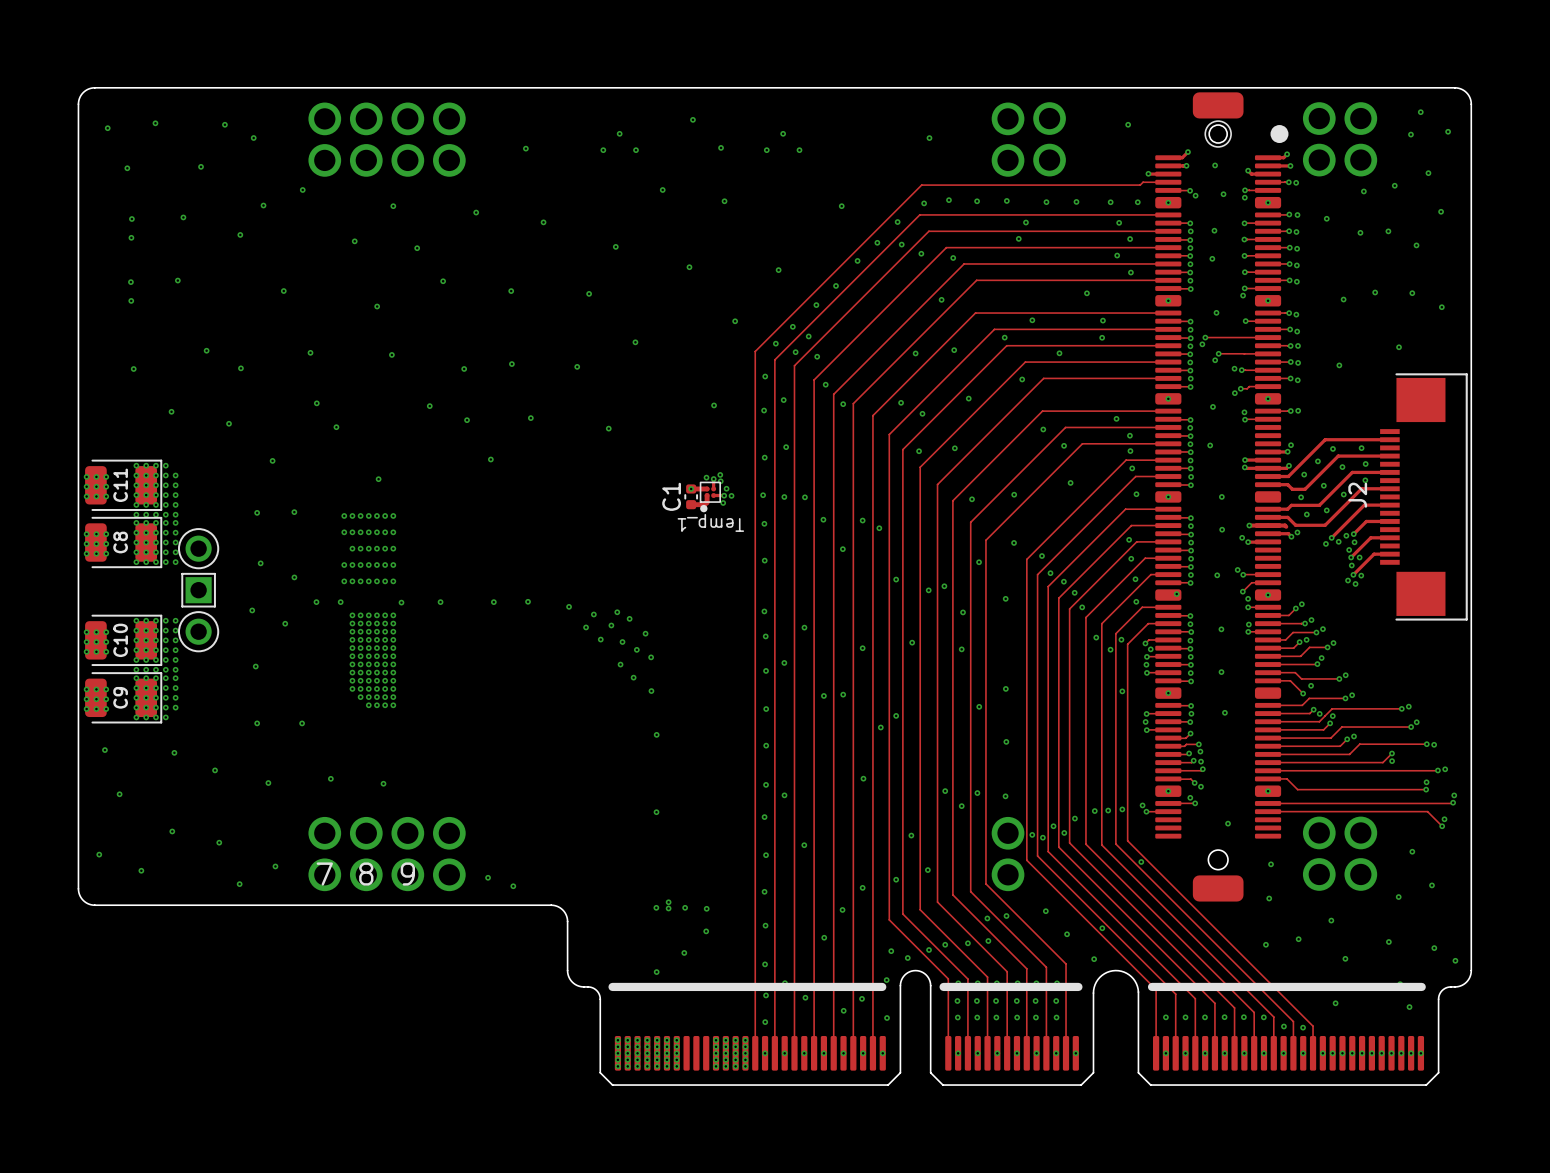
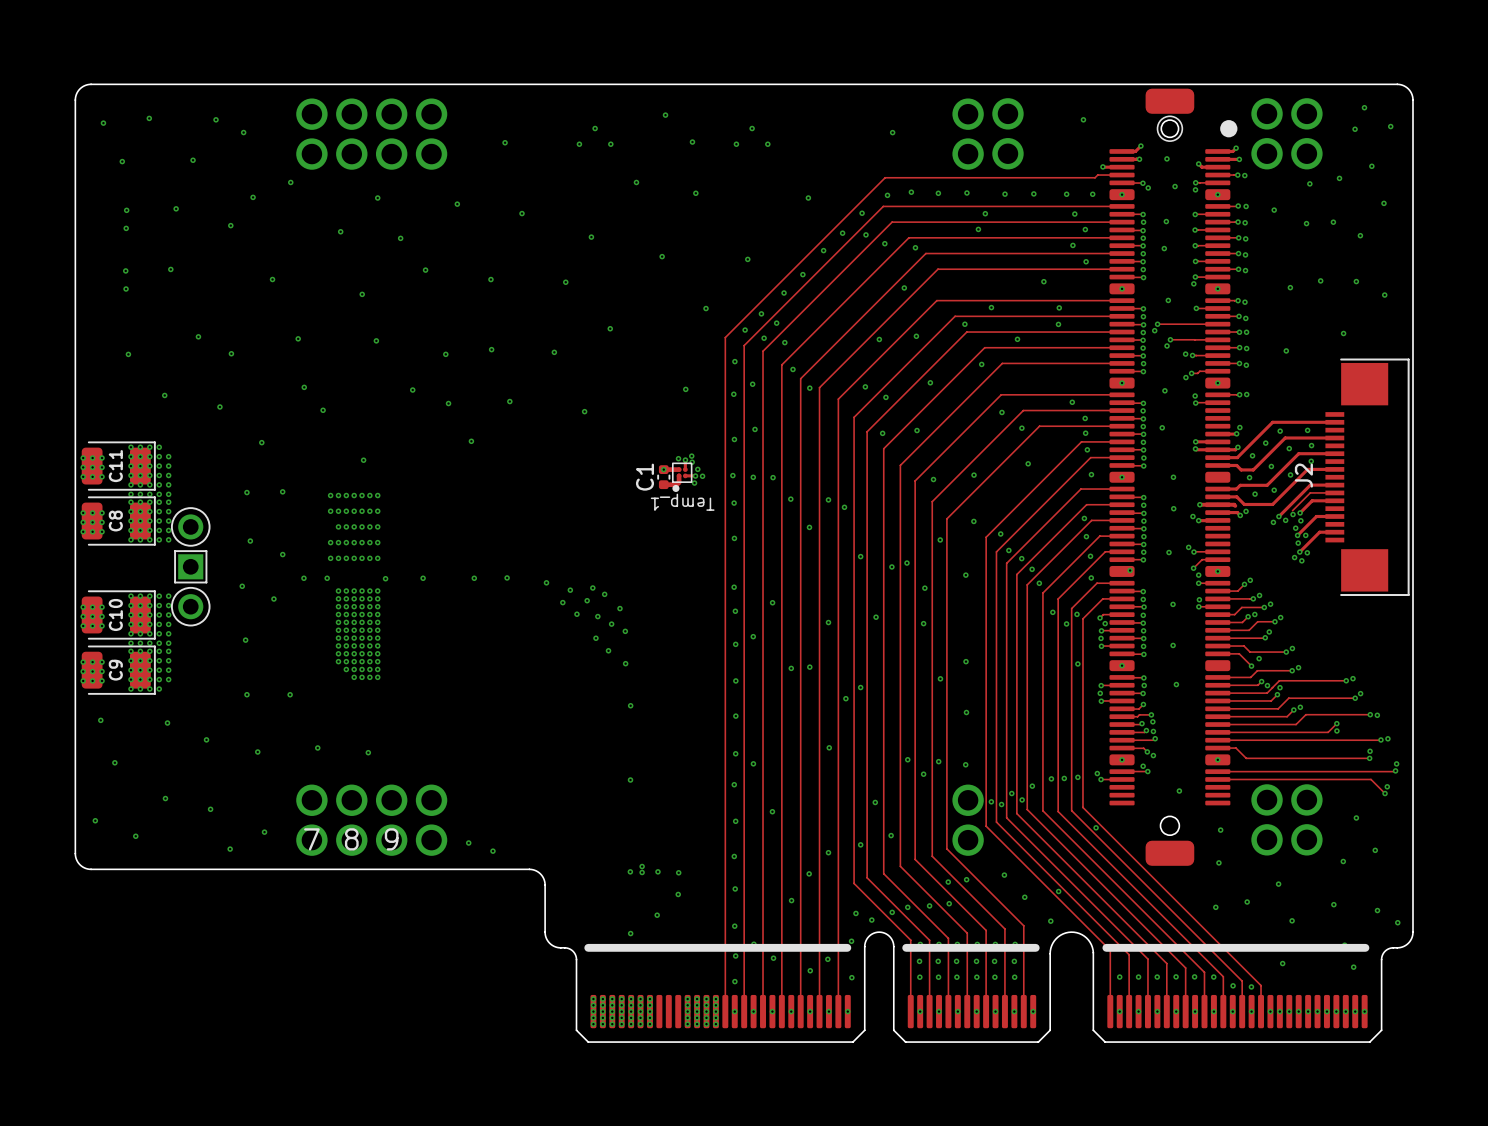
track: none -> (1334, 492) (1310, 492) (1292, 510)

